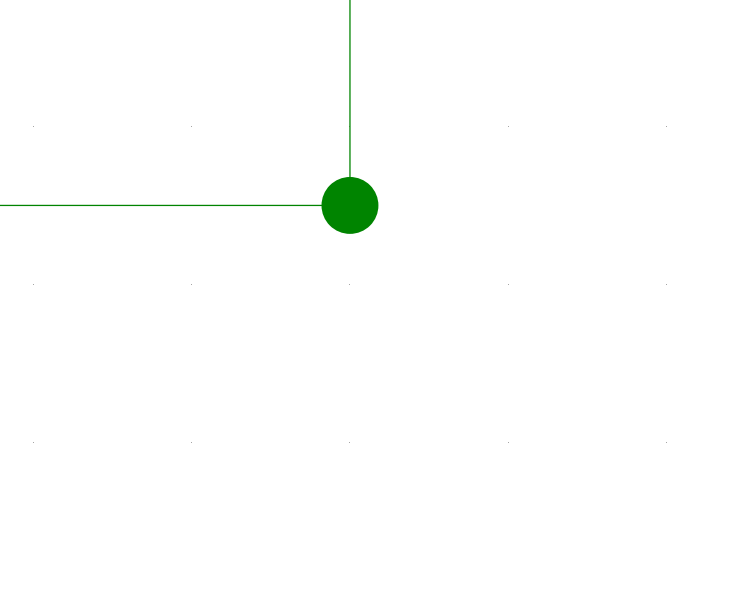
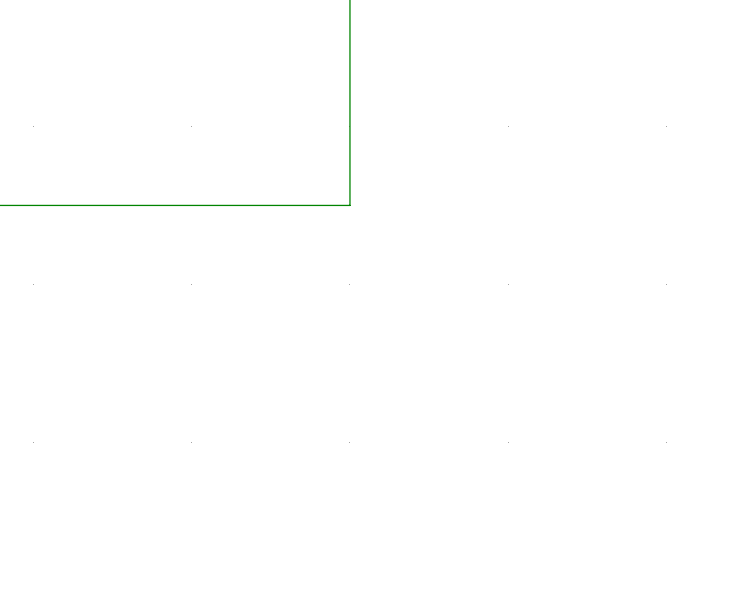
junction: (349, 205) -> none

